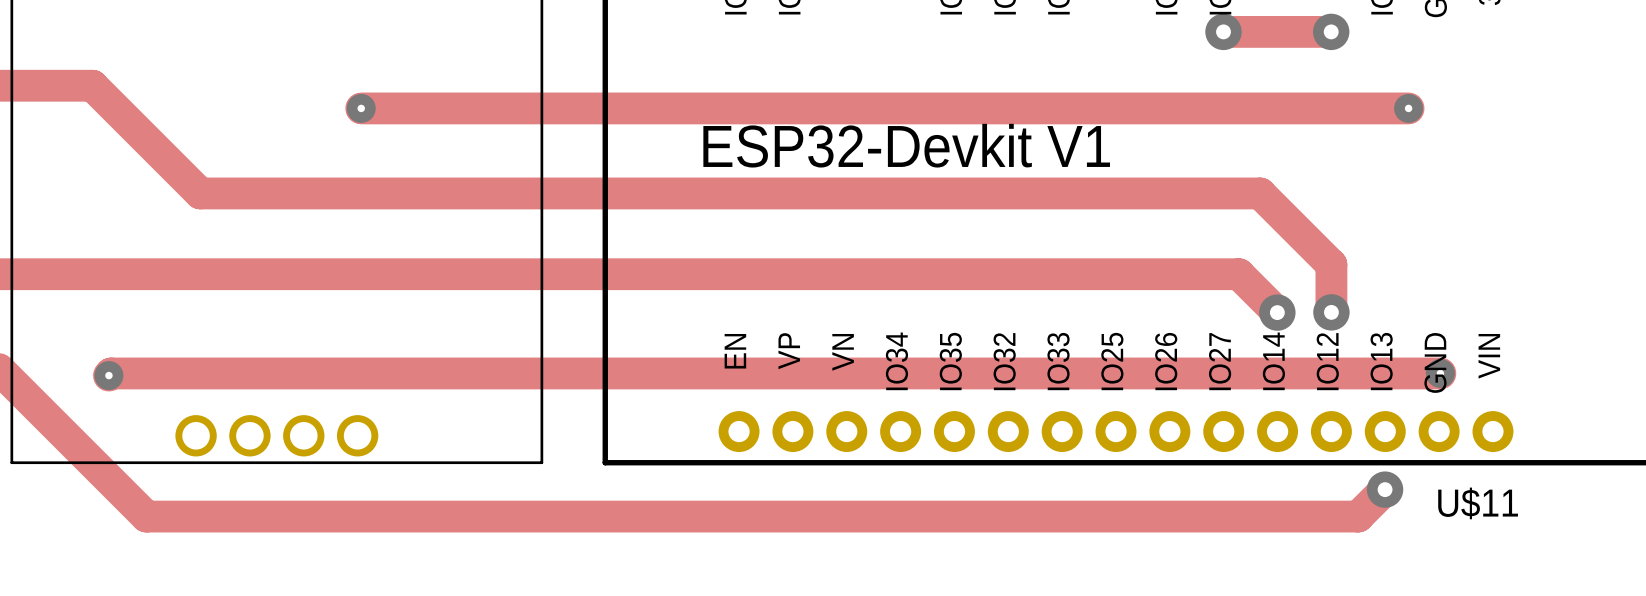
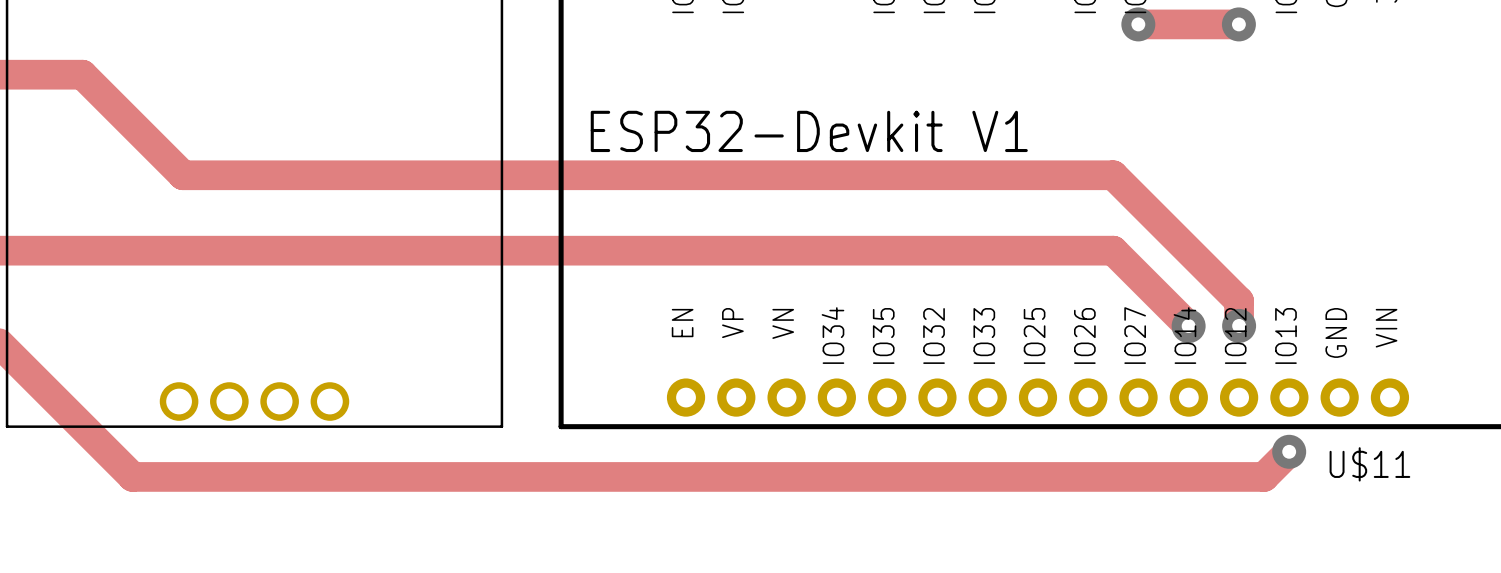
track: (361, 108) (1408, 108) -> none
via: (361, 108) -> none
via: (1408, 108) -> none
track: (1196, 193) (1260, 193) (1331, 264) (1331, 312) -> (1113, 175) (1239, 301) (1239, 325)
track: (1196, 274) (1238, 274) (1277, 312) -> (1113, 250) (1188, 326)
via: (1277, 312) -> none
via: (1331, 312) -> none
via: none -> (1239, 325)
via: none -> (1188, 326)
track: (1440, 373) (111, 373) (108, 375) -> none
via: (1440, 373) -> none
via: (108, 375) -> none

